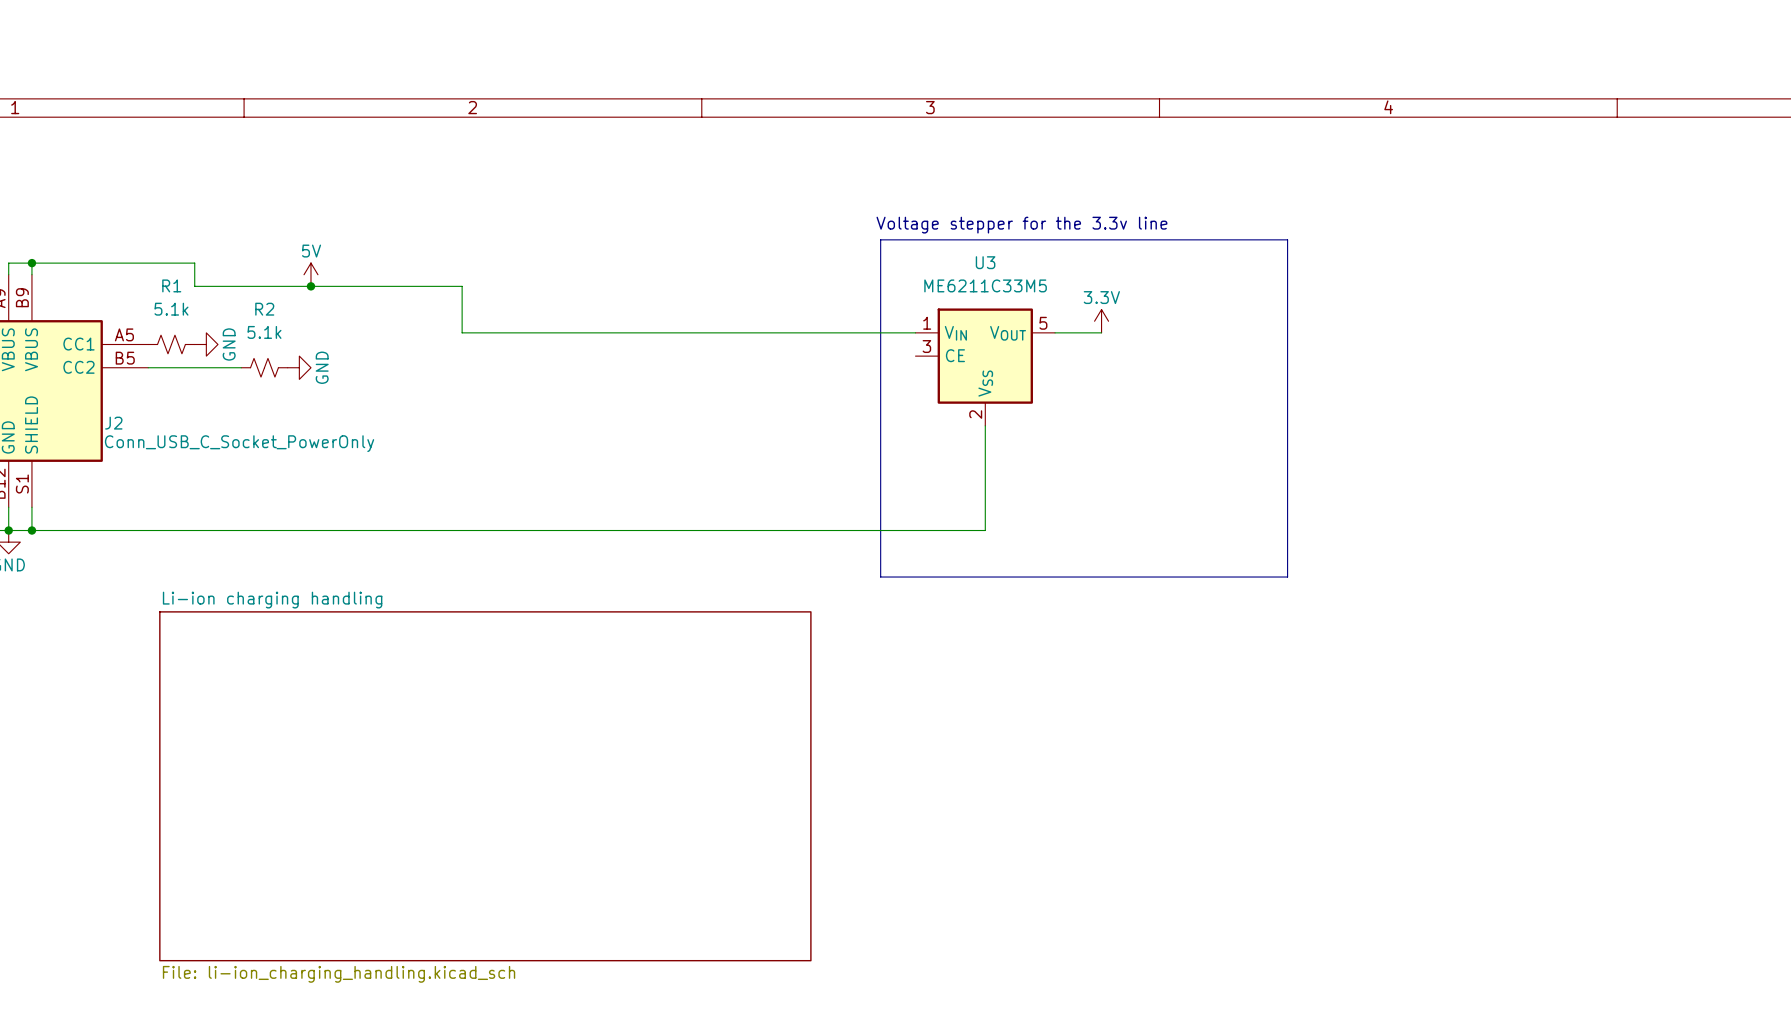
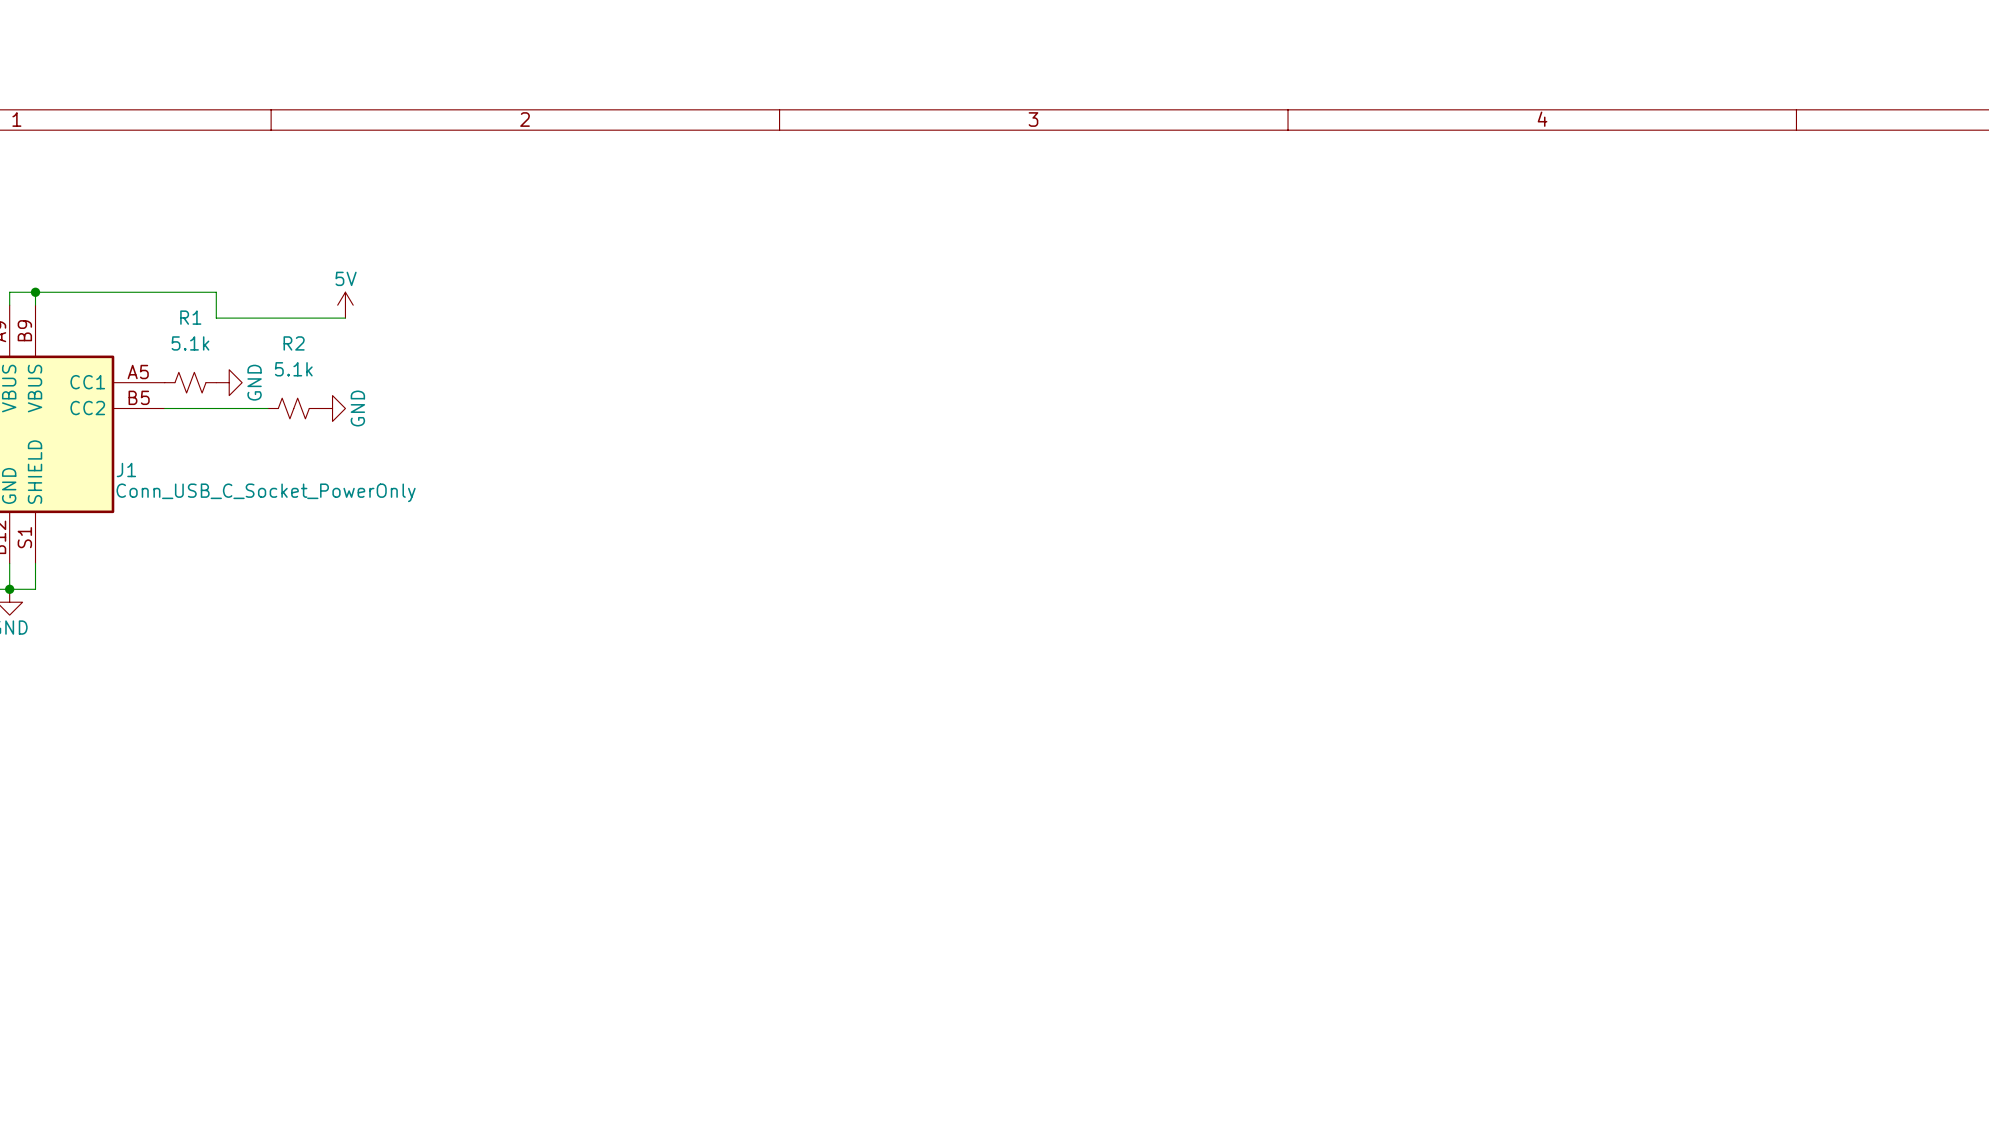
text: Voltage stepper for the 3.3v line (1021, 225) -> none
line: (880, 239) (1287, 239) (1287, 577) (880, 577) (880, 239) -> none
wire: (310, 286) (462, 286) (462, 332) (915, 332) -> none
junction: (310, 286) -> none
power symbol: 3.3V (1101, 321) -> none
wire: (1055, 332) (1101, 332) -> none
U3: ME6211C33M5 (985, 367) -> none
J2 name: J2 (113, 423) -> J1 (126, 470)
wire: (985, 425) (985, 530) (31, 530) -> none
junction: (31, 530) -> none
sheet Li-ion charging handling: File: li-ion_charging_handling.kicad_sch (485, 786) -> none

